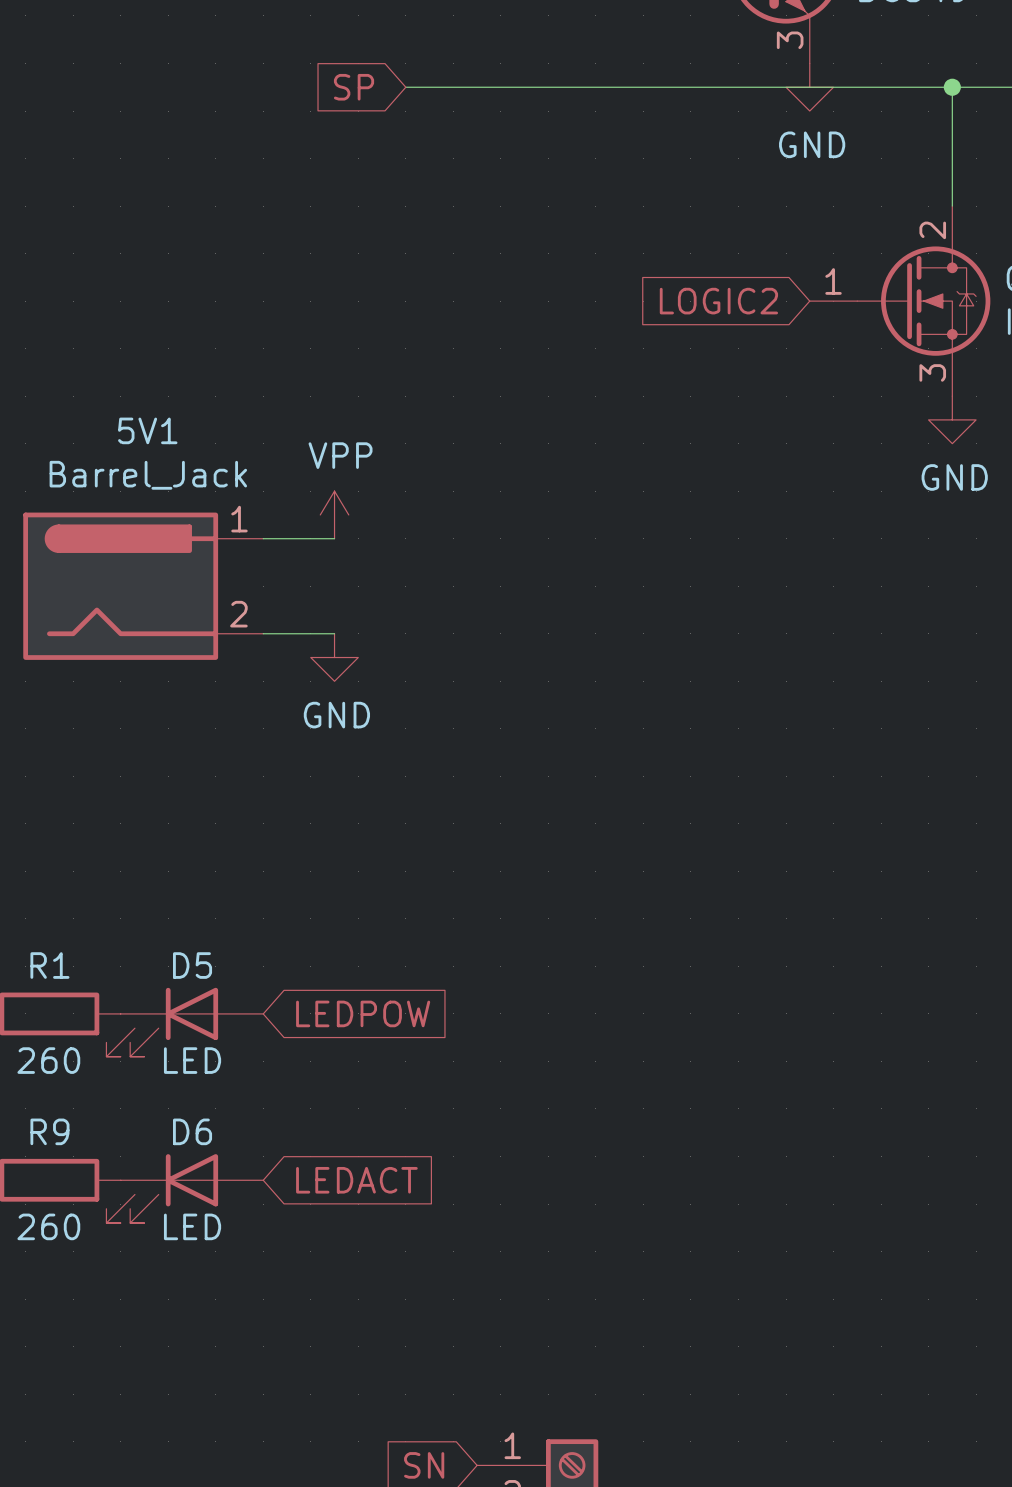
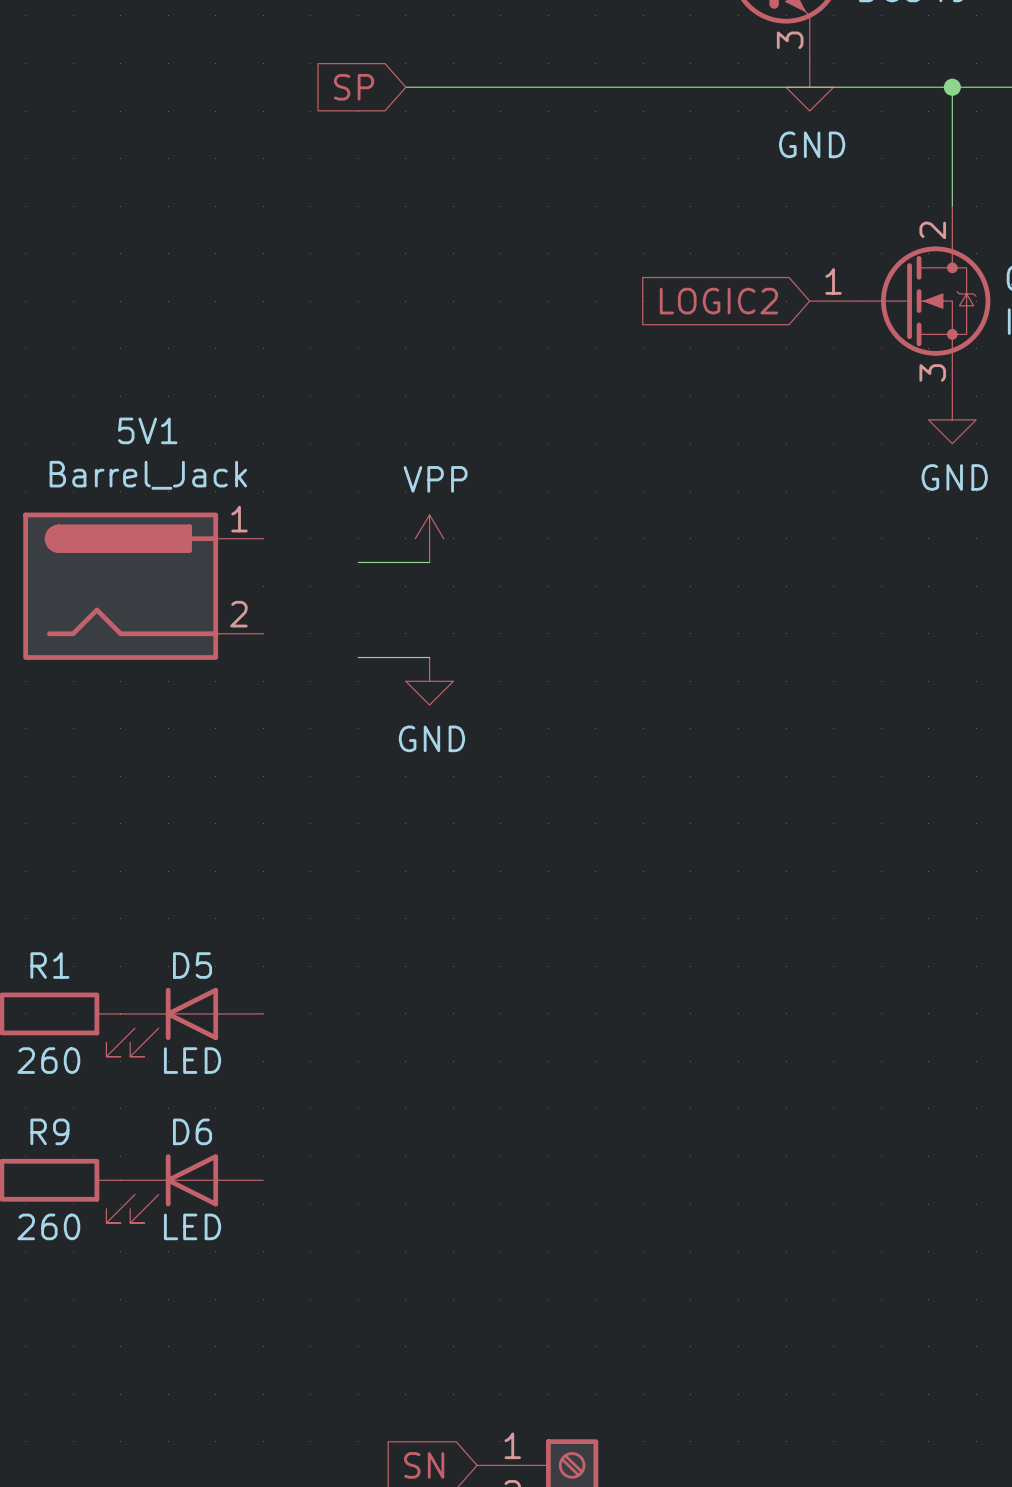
power symbol position: VPP (334, 514) -> VPP (429, 538)
wire: (263, 538) (334, 538) -> (358, 562) (429, 562)
wire: (263, 633) (334, 633) -> (358, 657) (429, 657)
power symbol position: GND (334, 657) -> GND (429, 681)
global label: LEDPOW (363, 1013) -> none
global label: LEDACT (356, 1180) -> none

